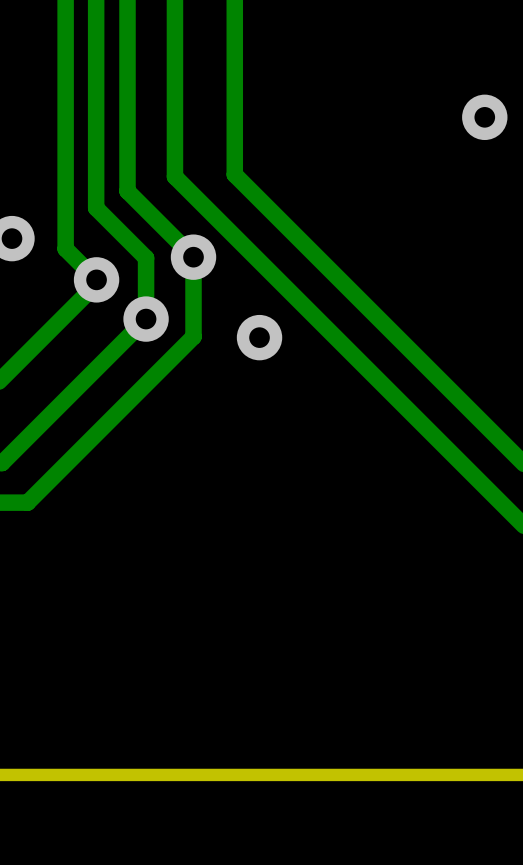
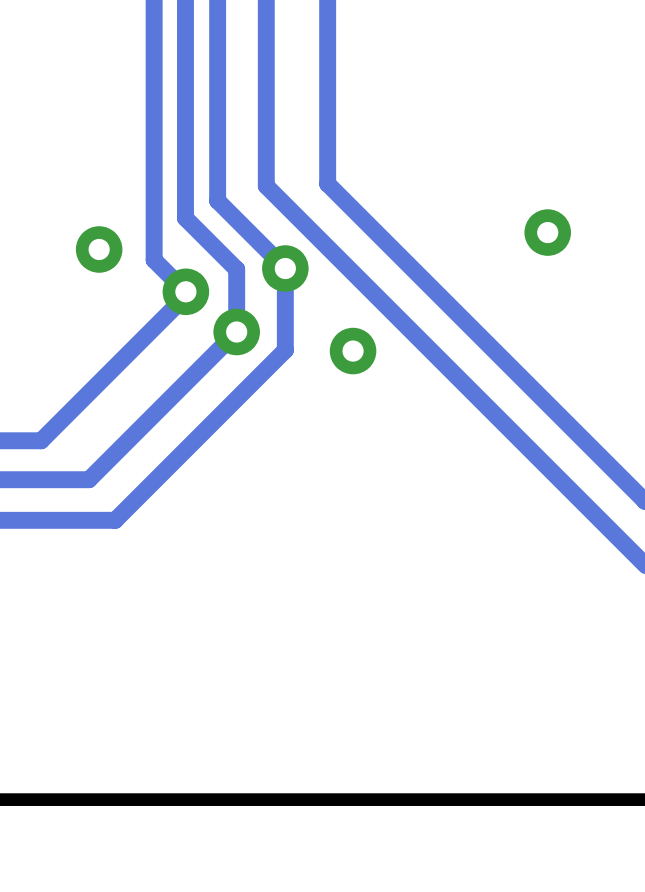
via position: (484, 117) -> (547, 232)

